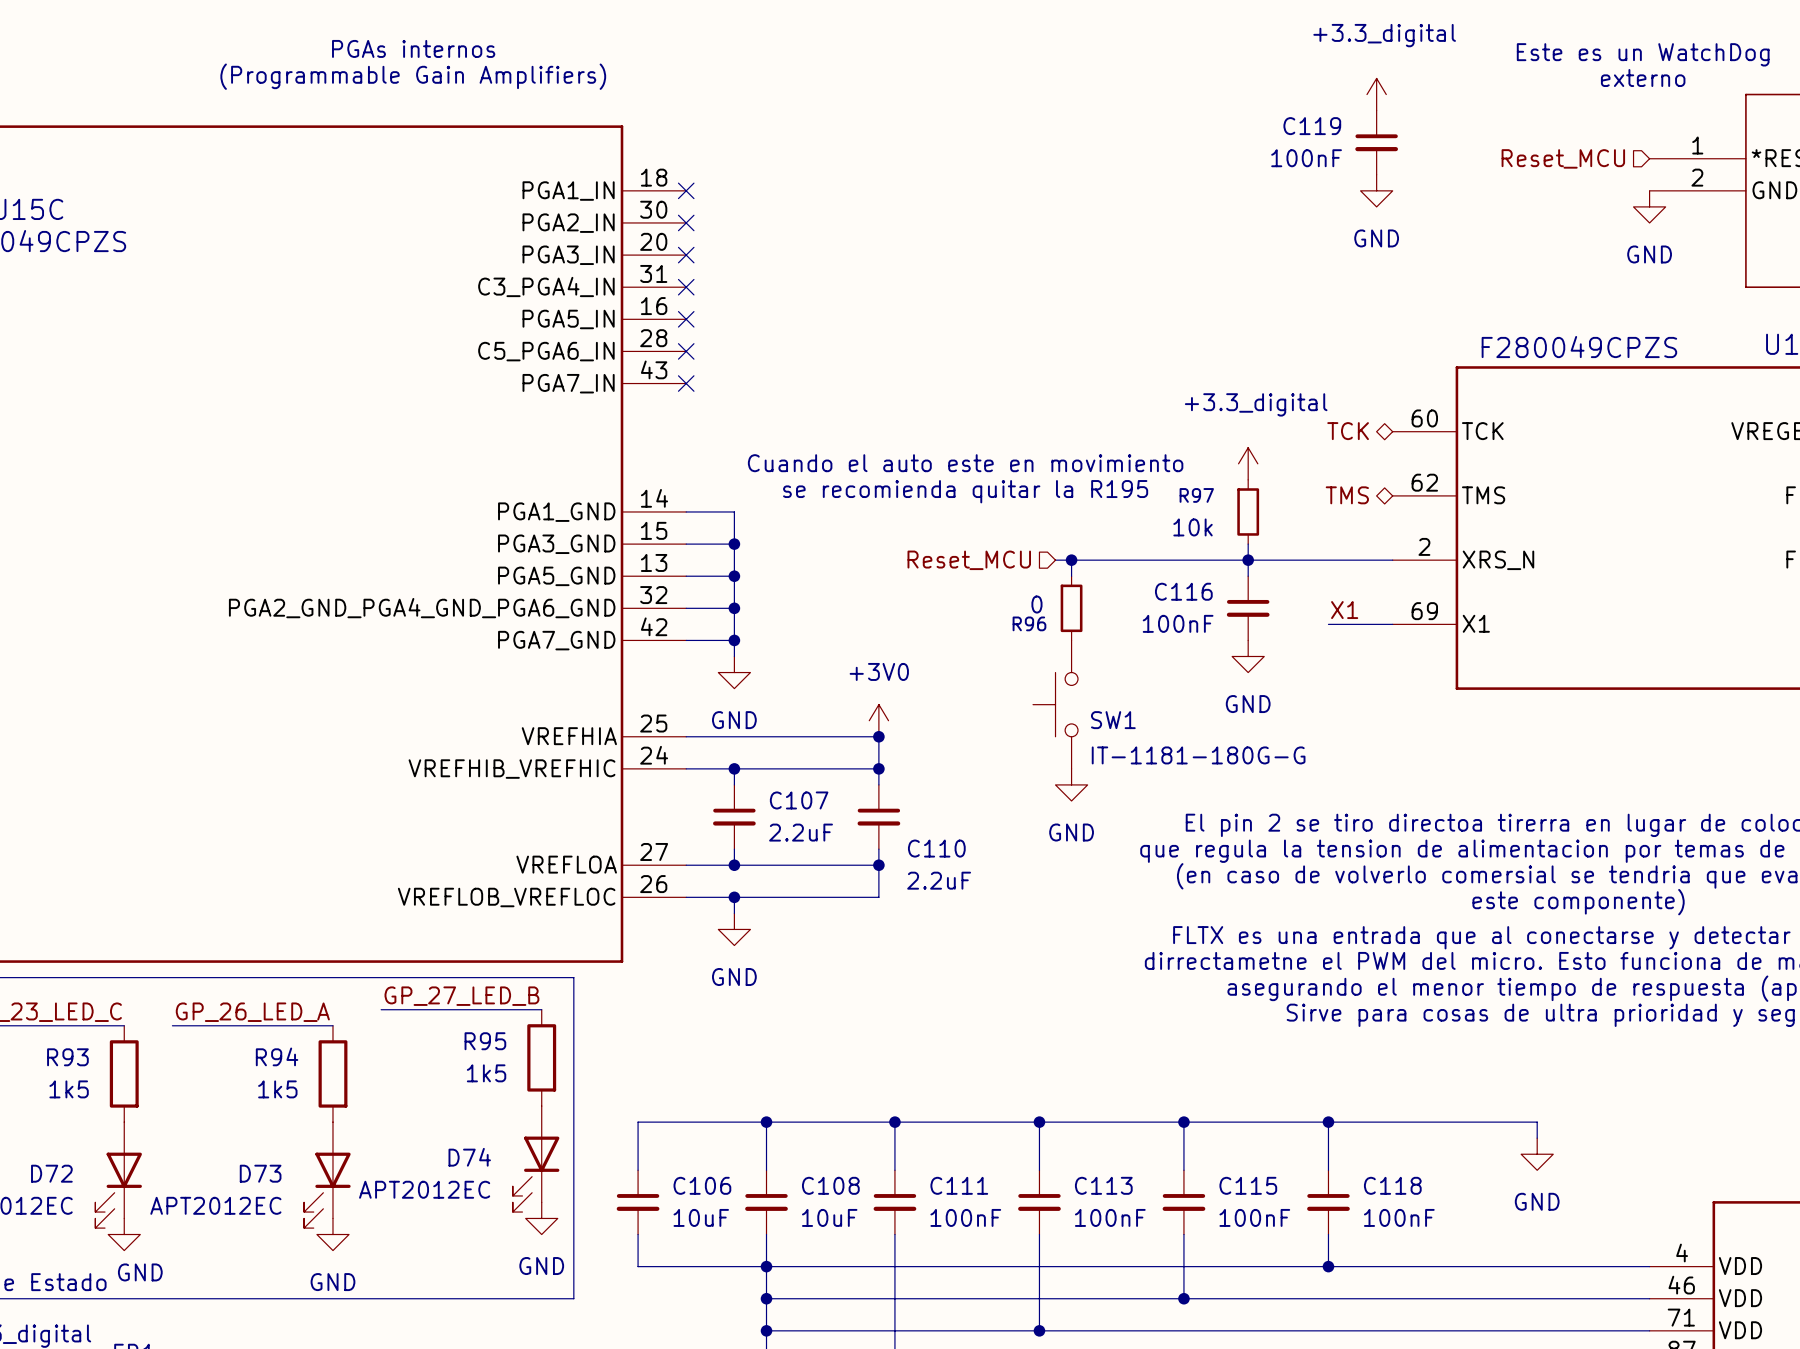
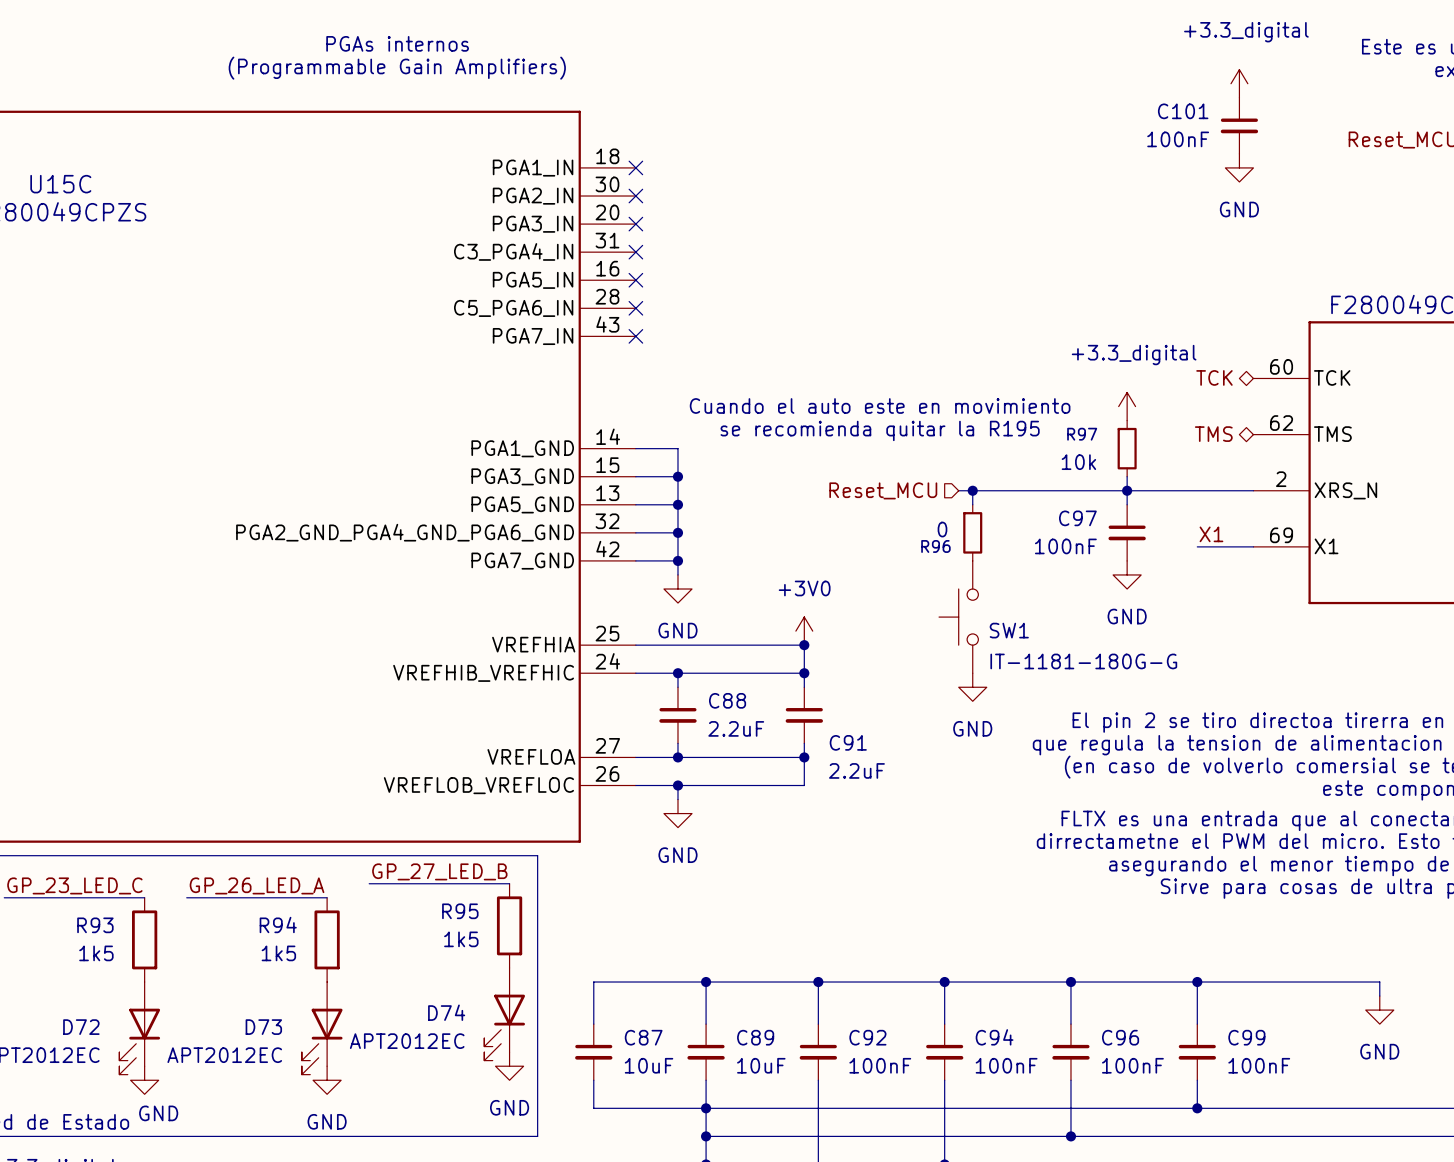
C119 name: C119 (1312, 126) -> C101 (1183, 111)
C116 name: C116 (1183, 591) -> C97 (1077, 518)
C107 name: C107 (799, 800) -> C88 (727, 700)
C110 name: C110 (936, 848) -> C91 (848, 742)
C106 name: C106 (702, 1185) -> C87 (643, 1037)
C108 name: C108 (830, 1185) -> C89 (755, 1037)
C111 name: C111 (959, 1185) -> C92 (867, 1037)
C113 name: C113 (1103, 1185) -> C94 (994, 1037)
C115 name: C115 (1248, 1185) -> C96 (1120, 1037)
C118 name: C118 (1392, 1185) -> C99 (1246, 1037)

